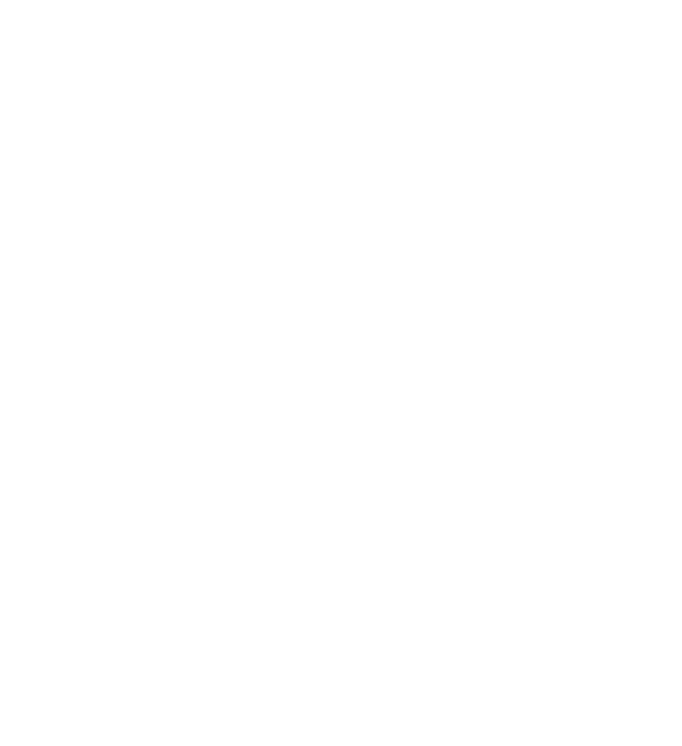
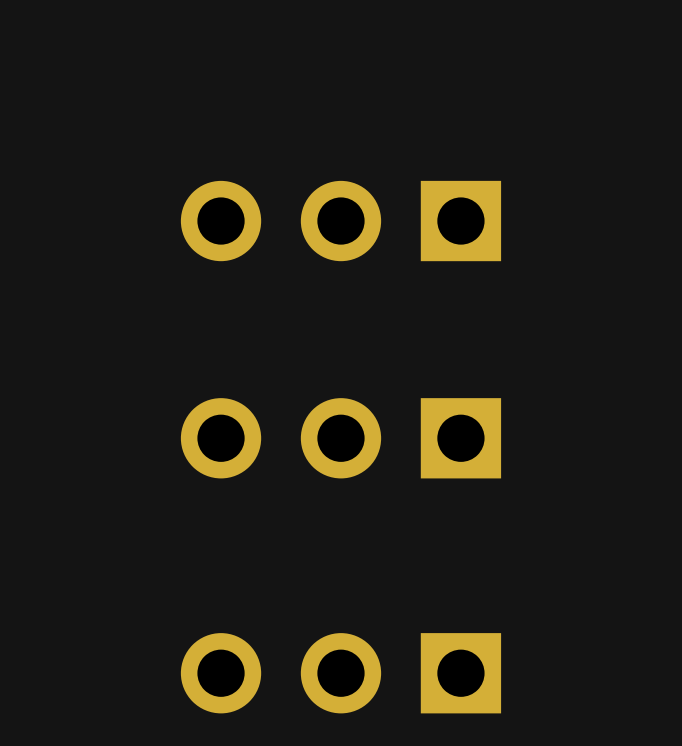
part: none -> (340, 221)
part: none -> (340, 438)
part: none -> (340, 673)

